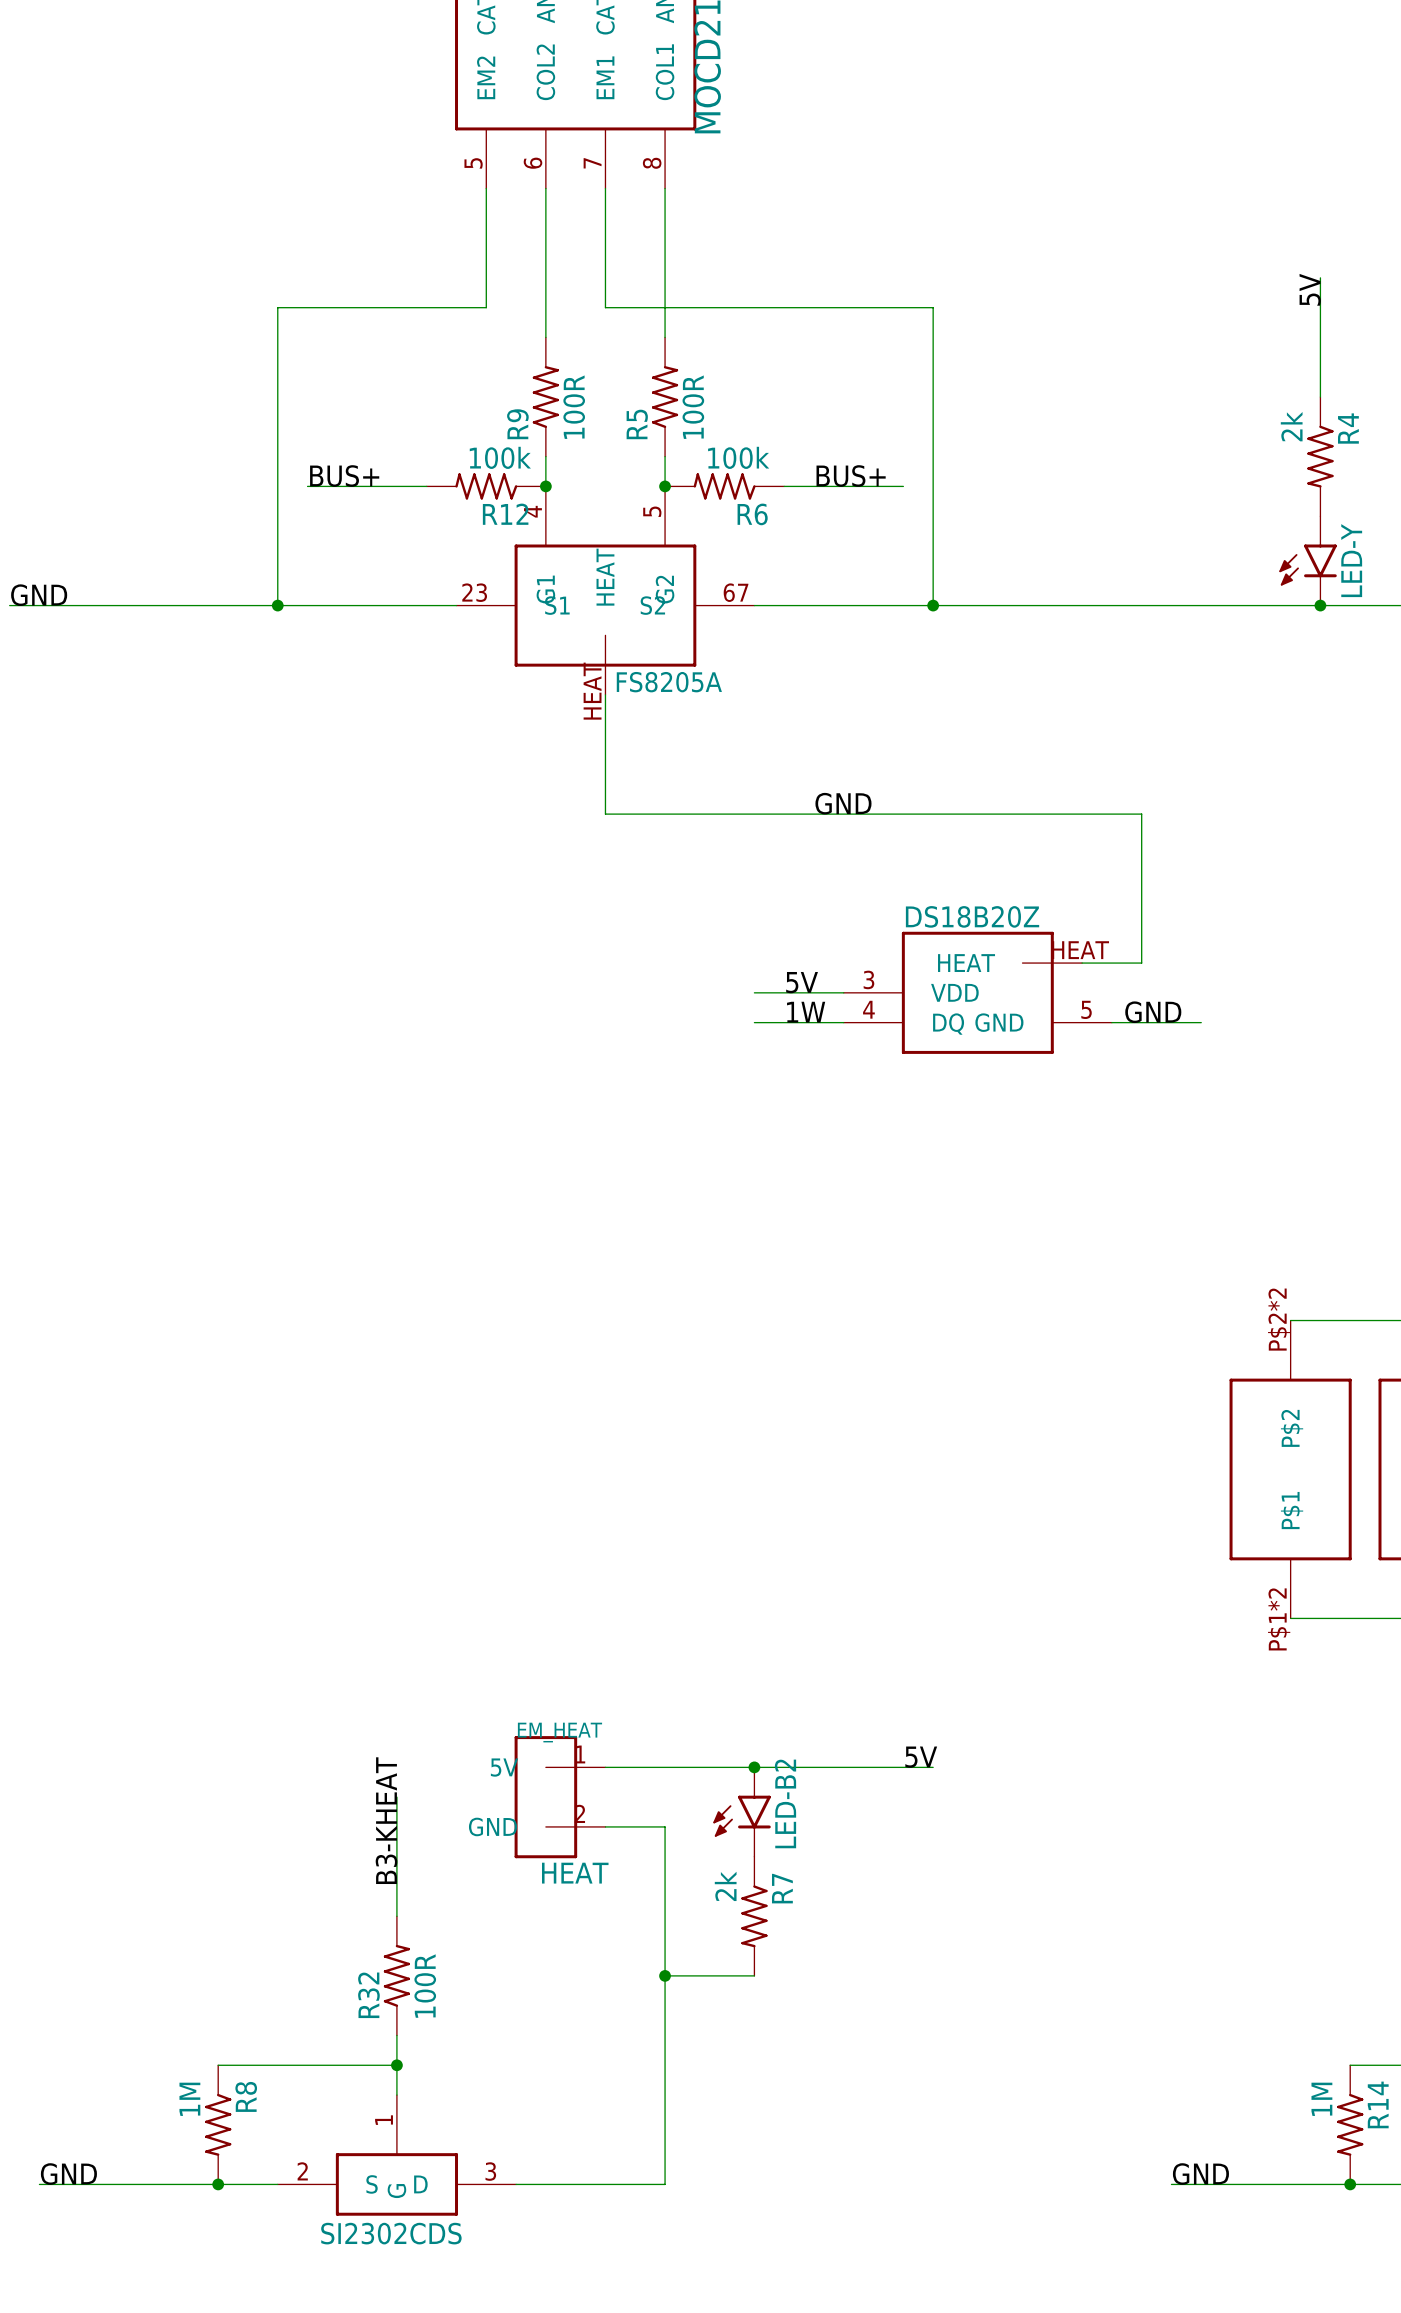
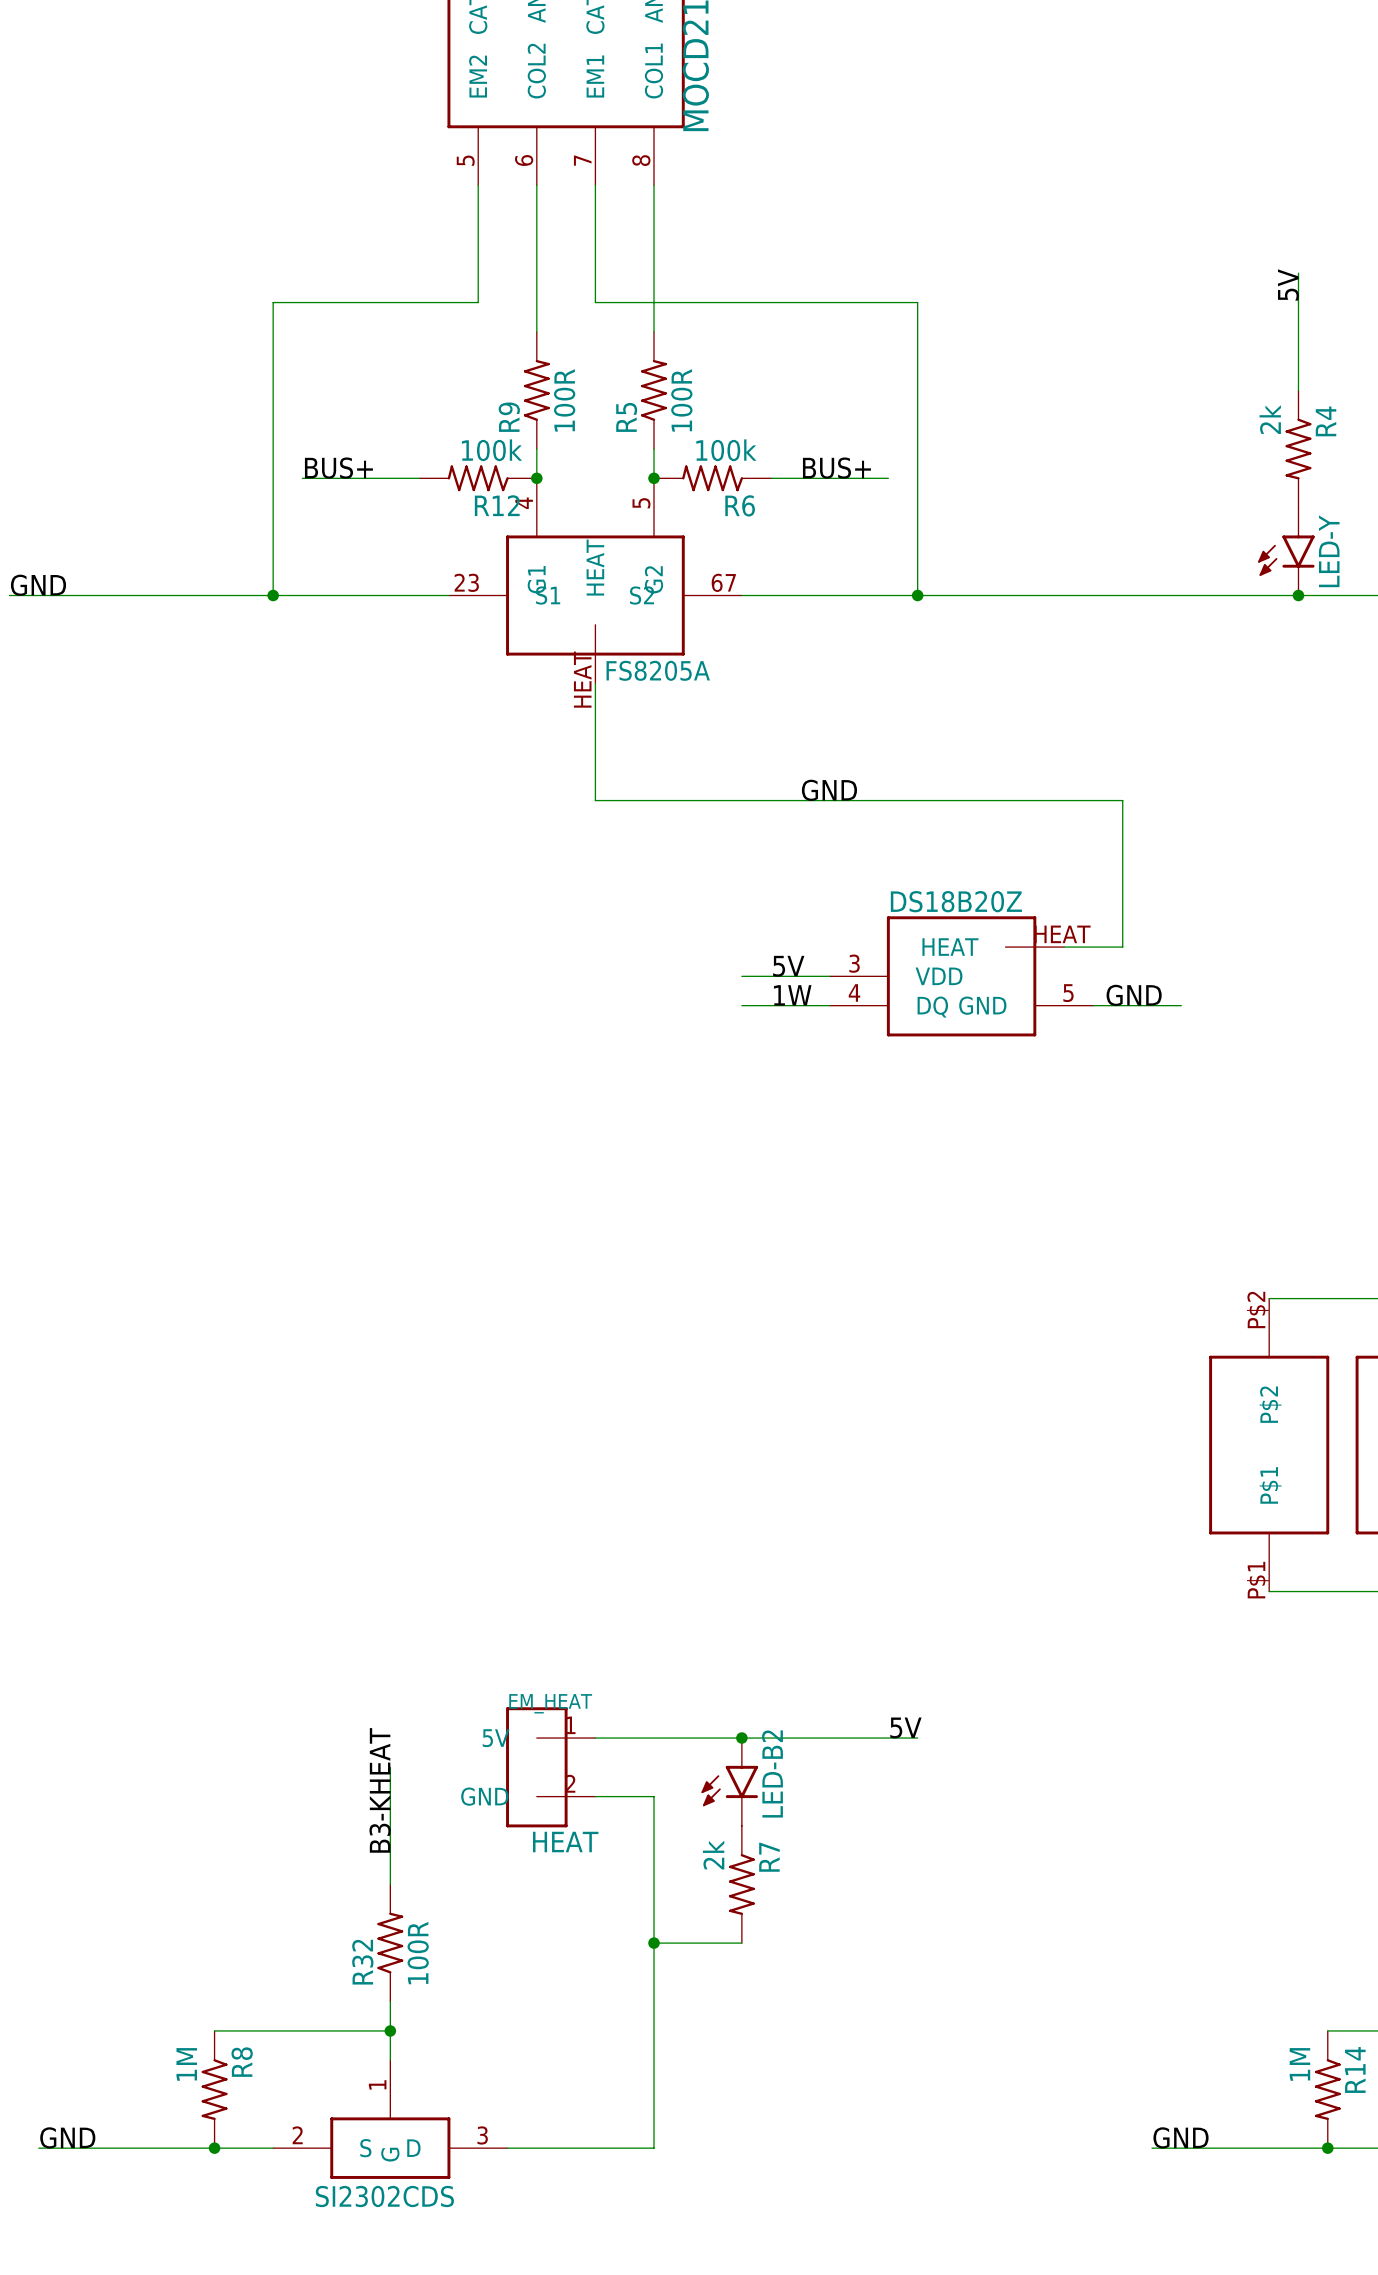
part pin number: P$2*2 (1279, 1319) -> P$2 (1257, 1309)
part pin number: P$1*2 (1279, 1619) -> P$1 (1257, 1580)

